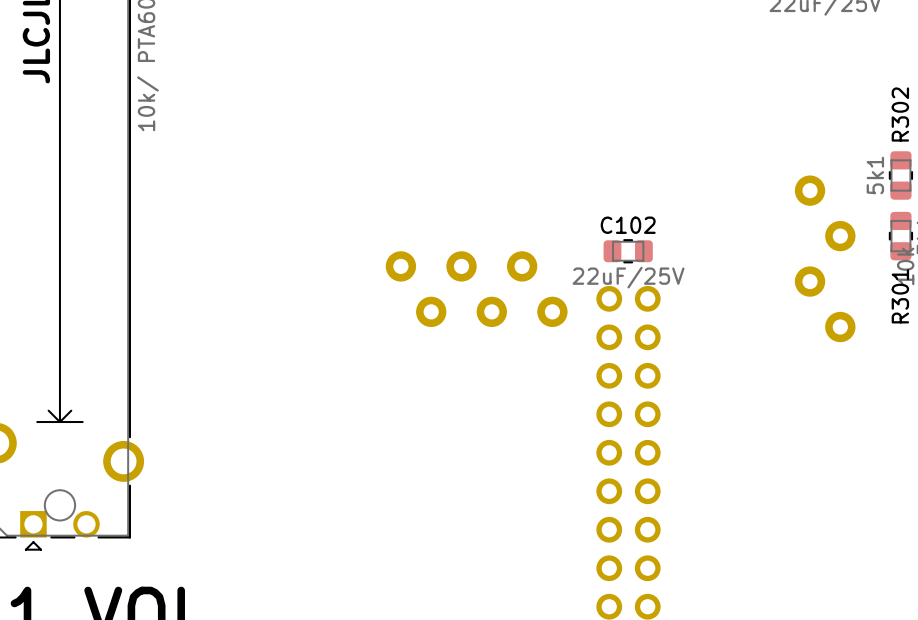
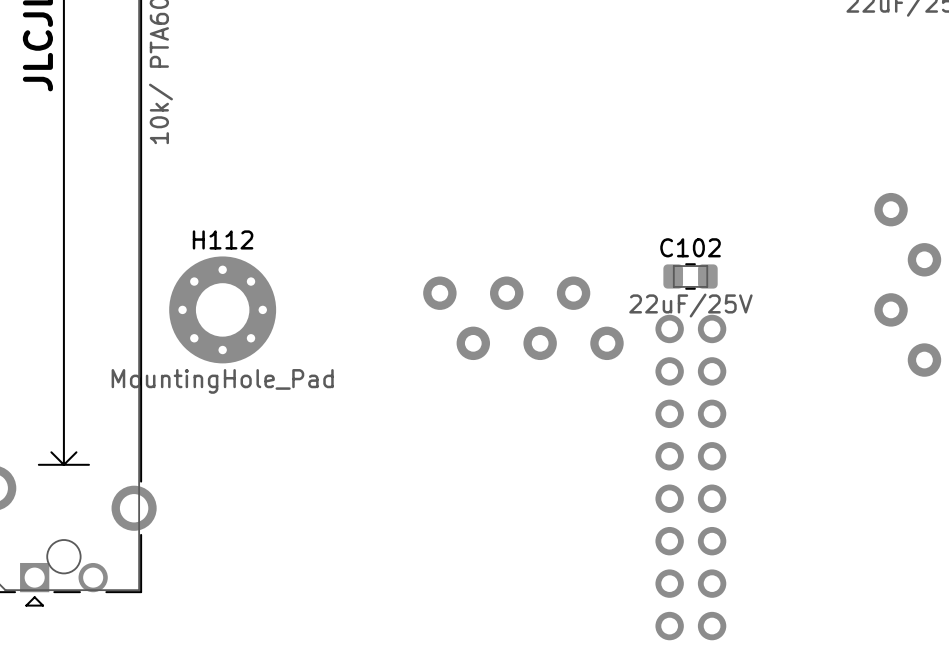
H112: none -> MountingHole_Pad (222, 309)

